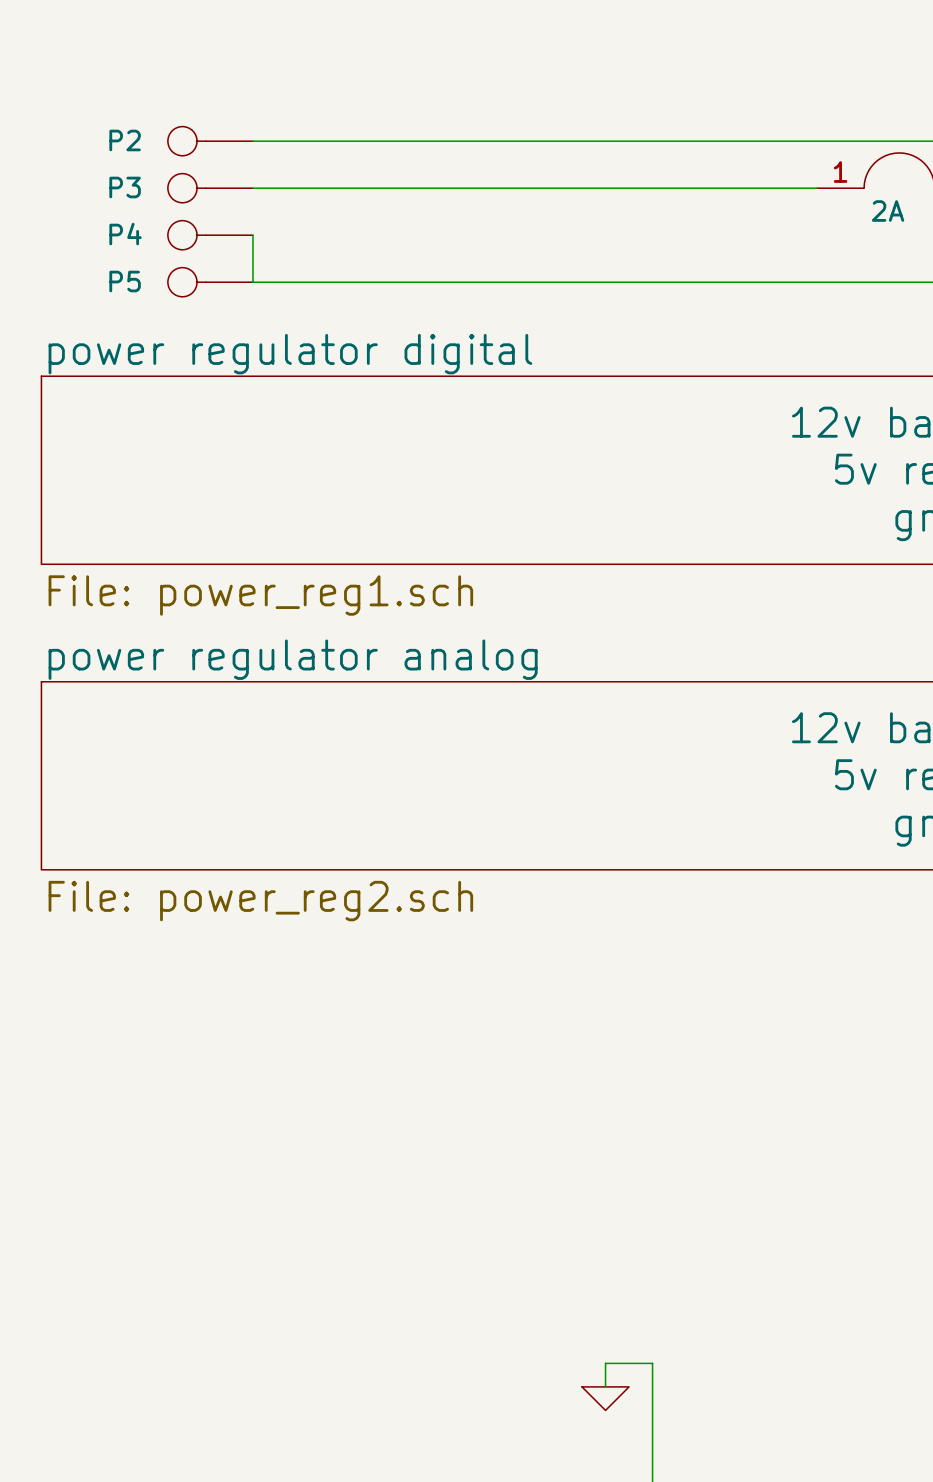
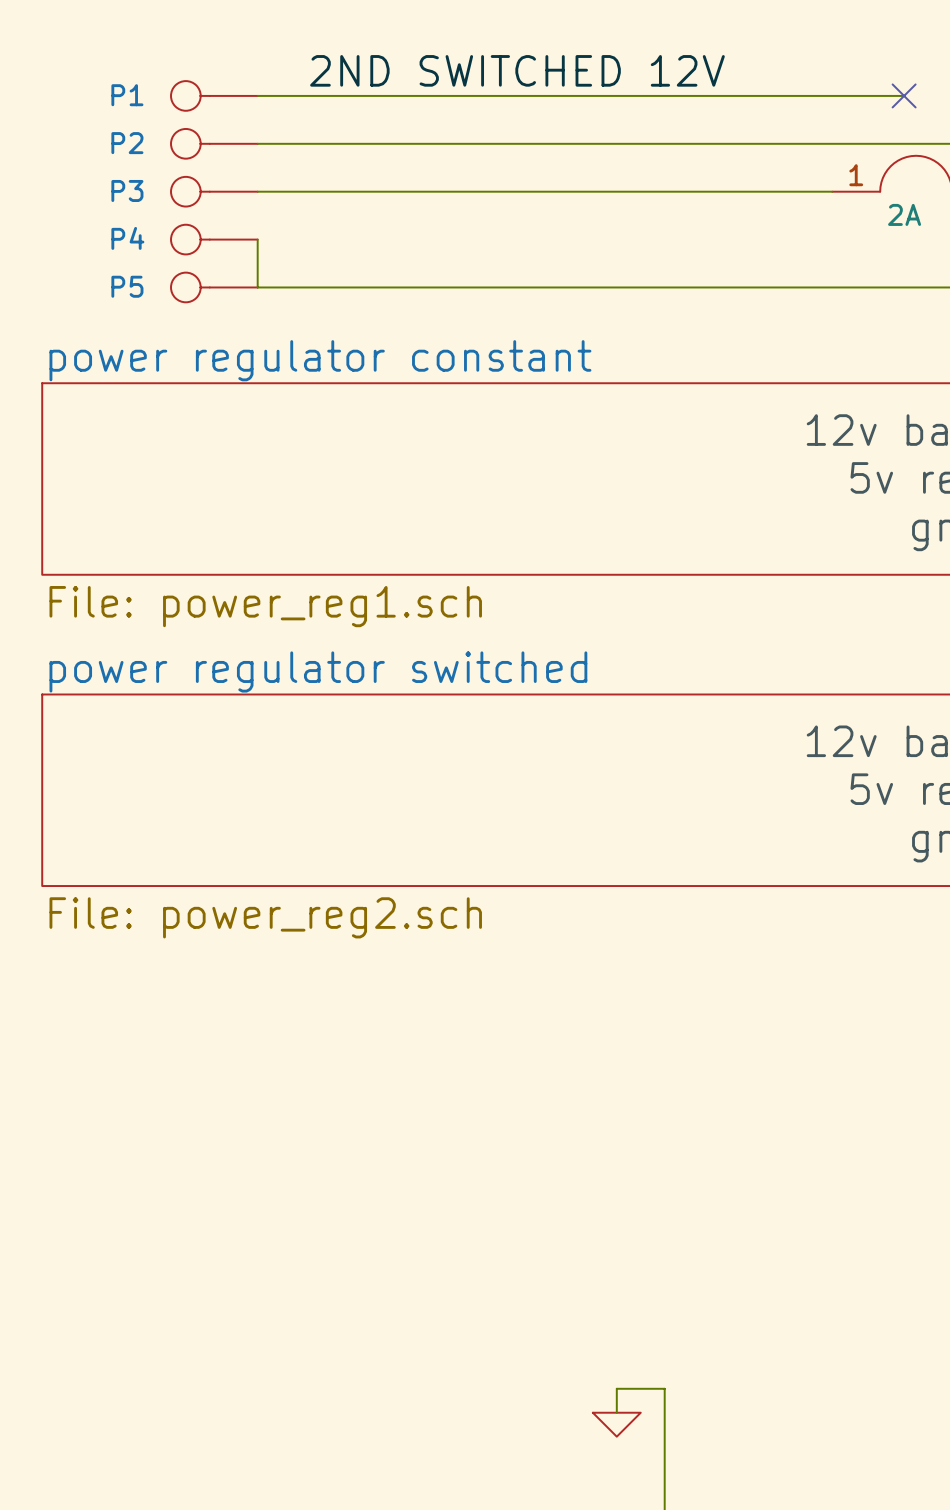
label: none -> 2ND SWITCHED 12V (517, 70)
P1: none -> (214, 95)
wire: none -> (257, 95) (904, 95)
no-connect mark: none -> (904, 95)
sheet power regulator digital name: power regulator digital (290, 354) -> power regulator constant (320, 360)
sheet power regulator analog name: power regulator analog (293, 659) -> power regulator switched (318, 671)

